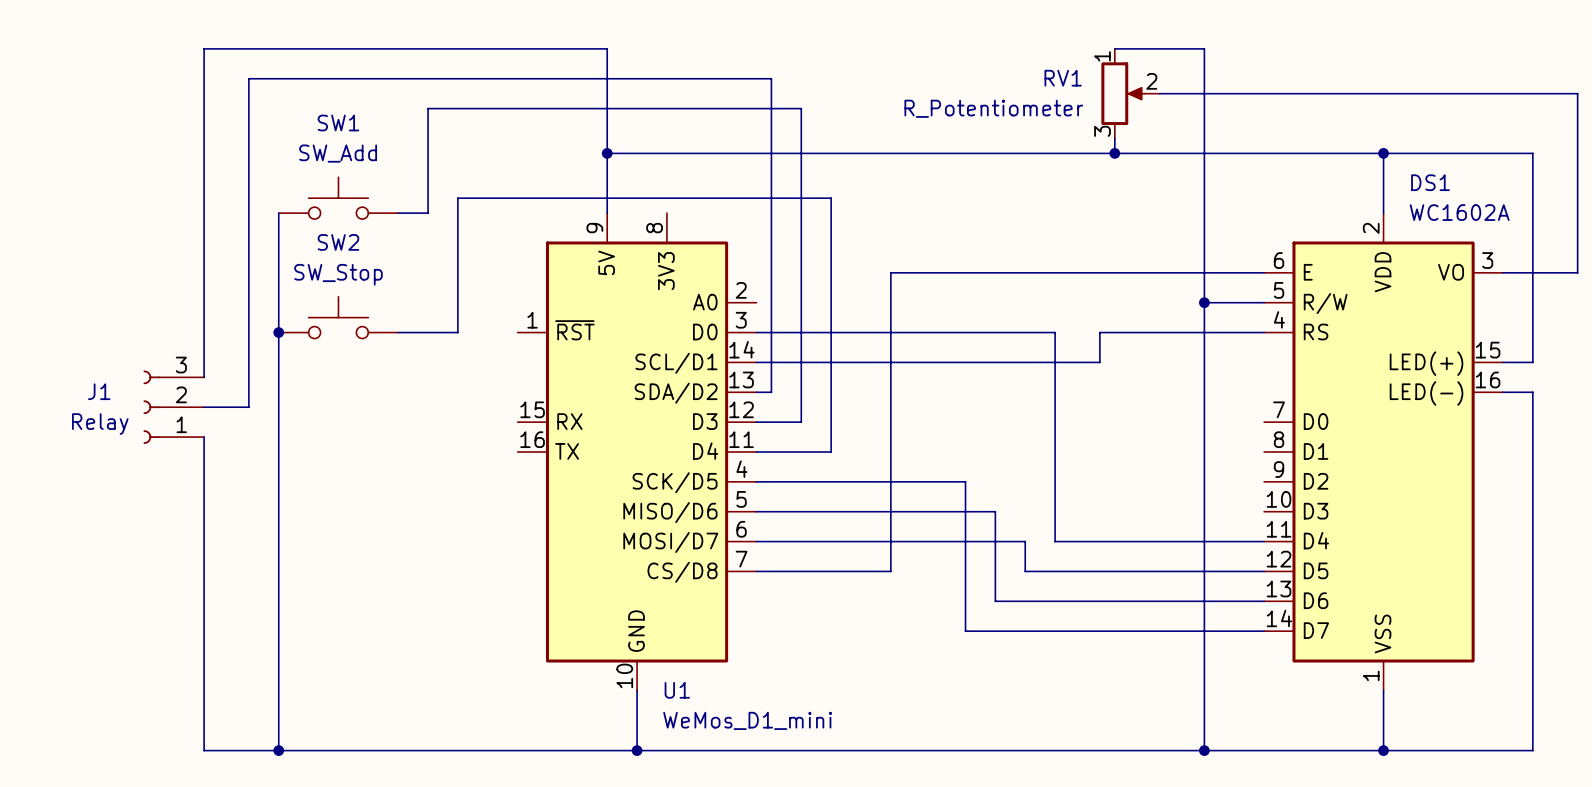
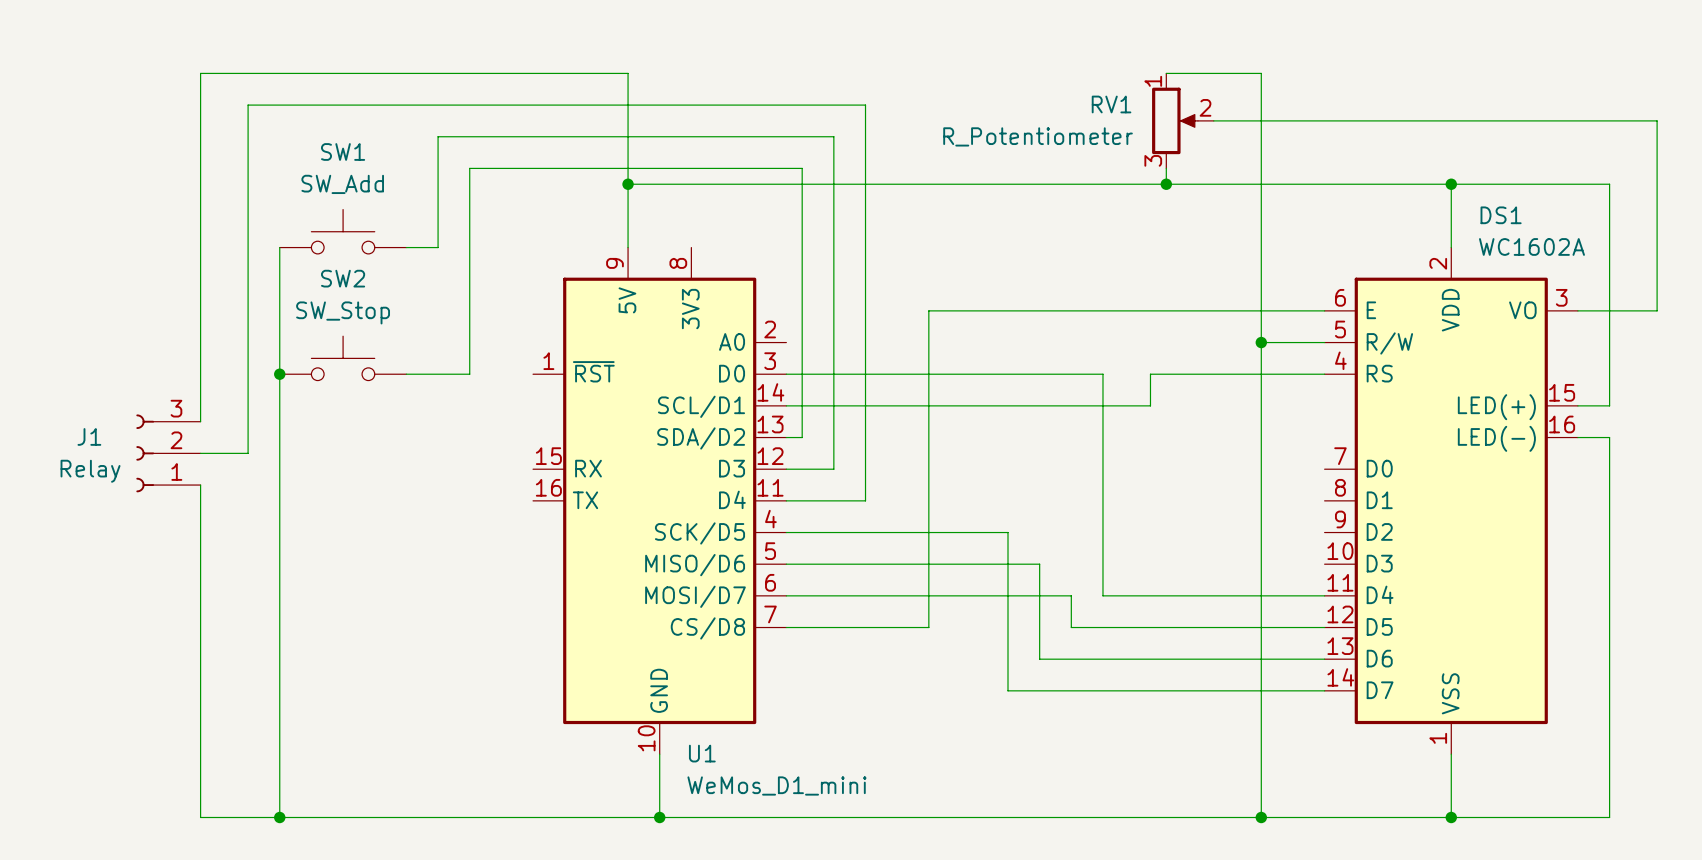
wire: (771, 78) (771, 138) -> (802, 105) (865, 105) (865, 231)
wire: (457, 198) (831, 198) -> (469, 231) (469, 168) (802, 168)

